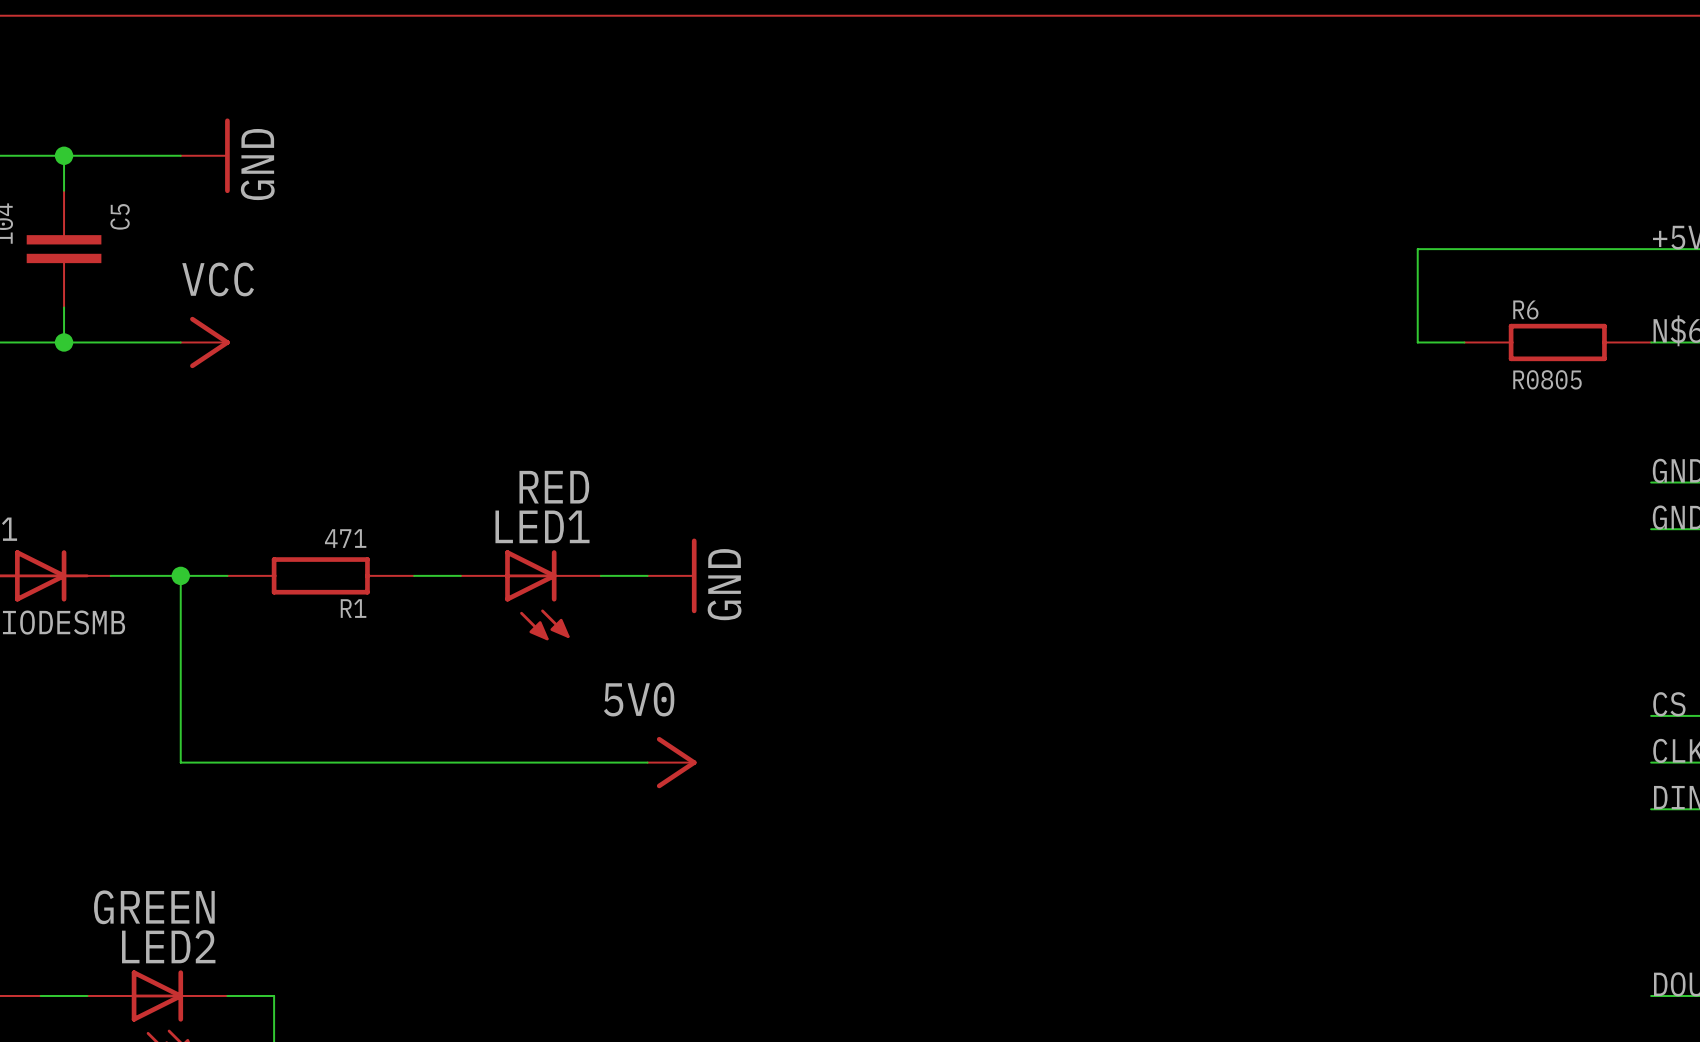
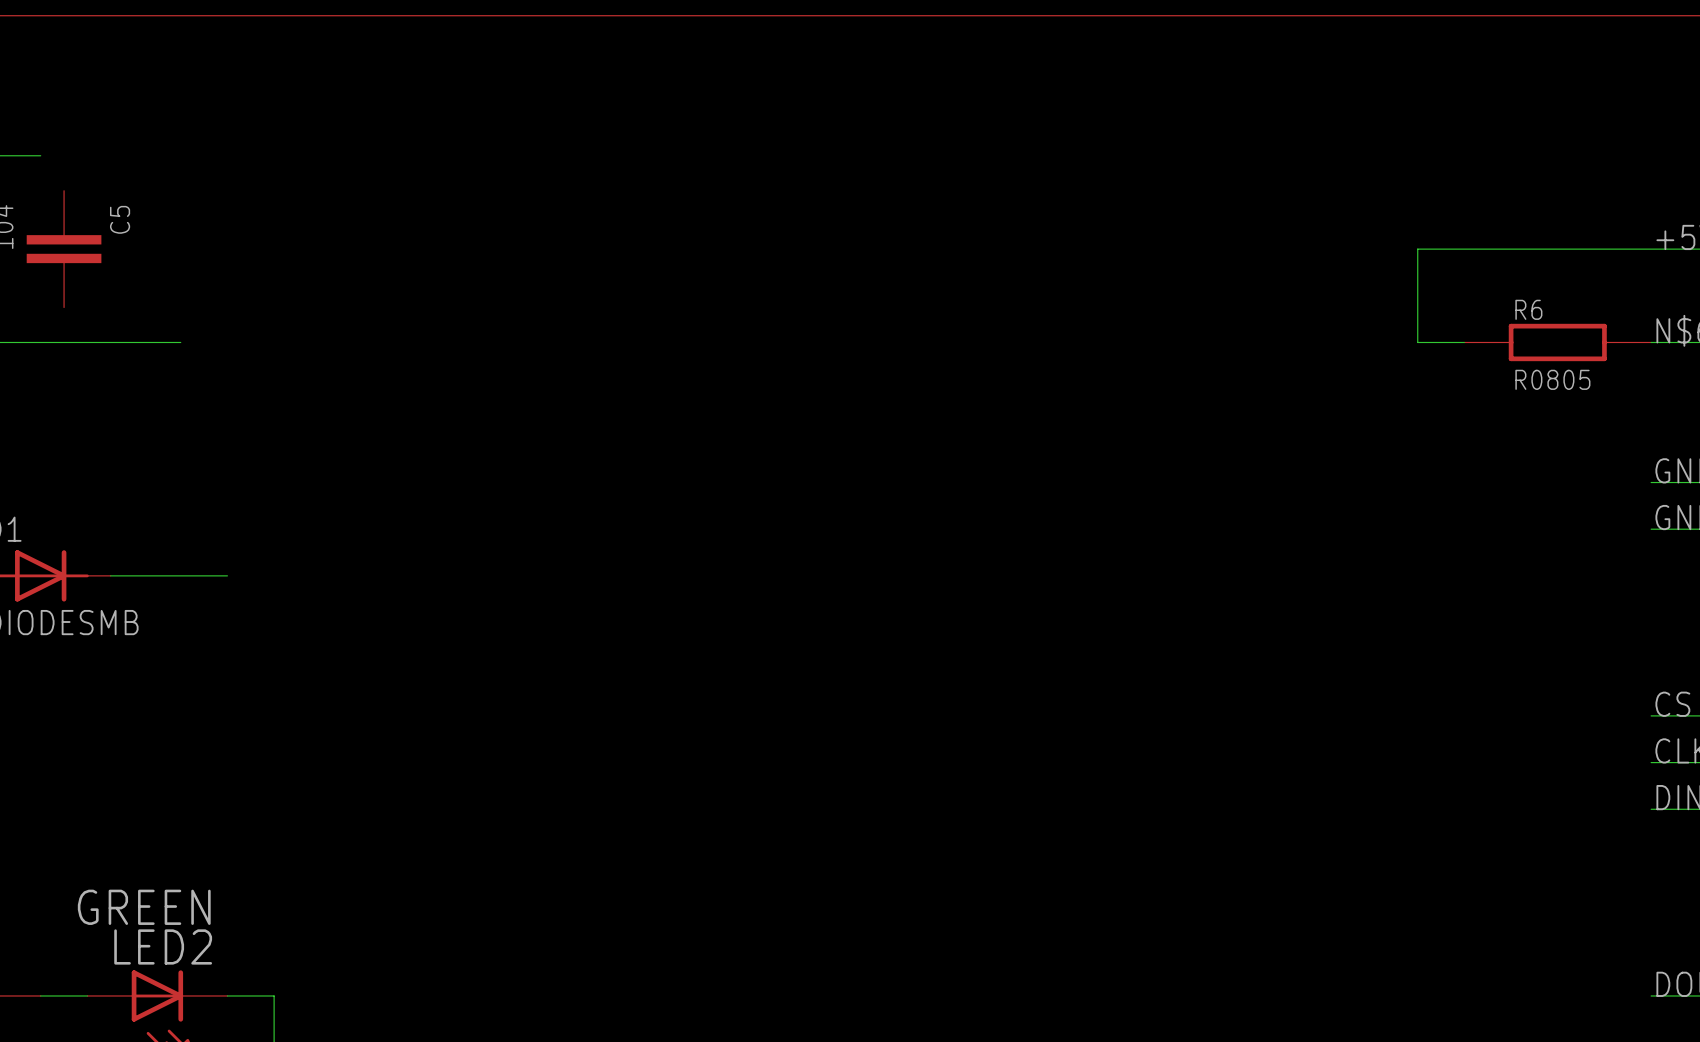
wire: (40, 155) (180, 155) -> none
wire: (64, 155) (64, 190) -> none
junction: (64, 155) -> none
power symbol: GND (205, 155) -> none
wire: (64, 307) (64, 342) -> none
junction: (64, 342) -> none
power symbol: VCC (205, 342) -> none
wire: (180, 575) (180, 762) (647, 762) -> none
junction: (180, 575) -> none
R1: 471 (320, 575) -> none
wire: (414, 575) (460, 575) -> none
wire: (600, 575) (647, 575) -> none
power symbol: GND (672, 575) -> none
LED1: RED (530, 595) -> none
power symbol: 5V0 (672, 762) -> none

